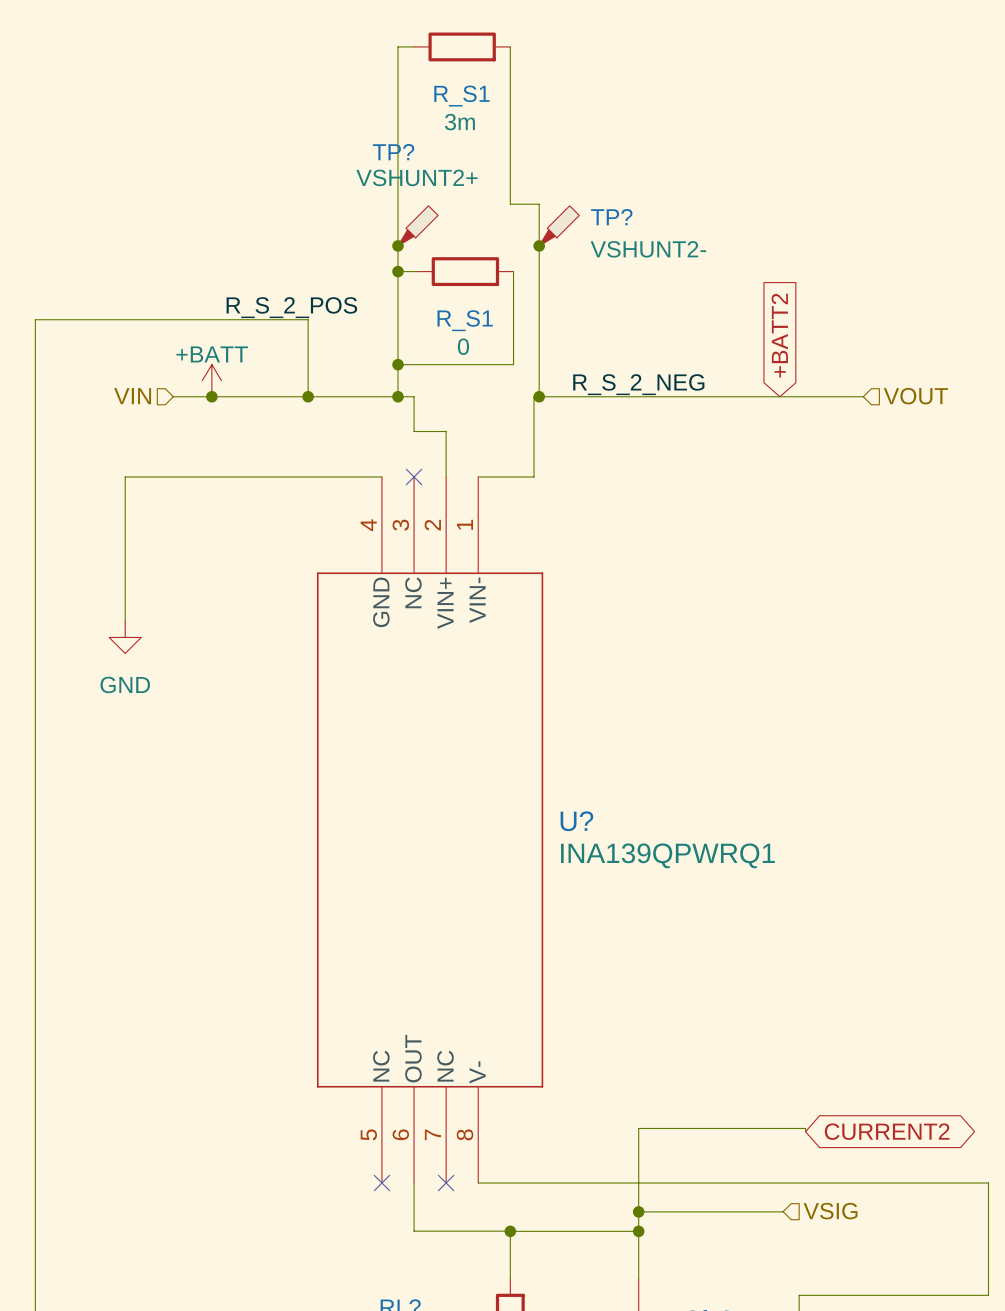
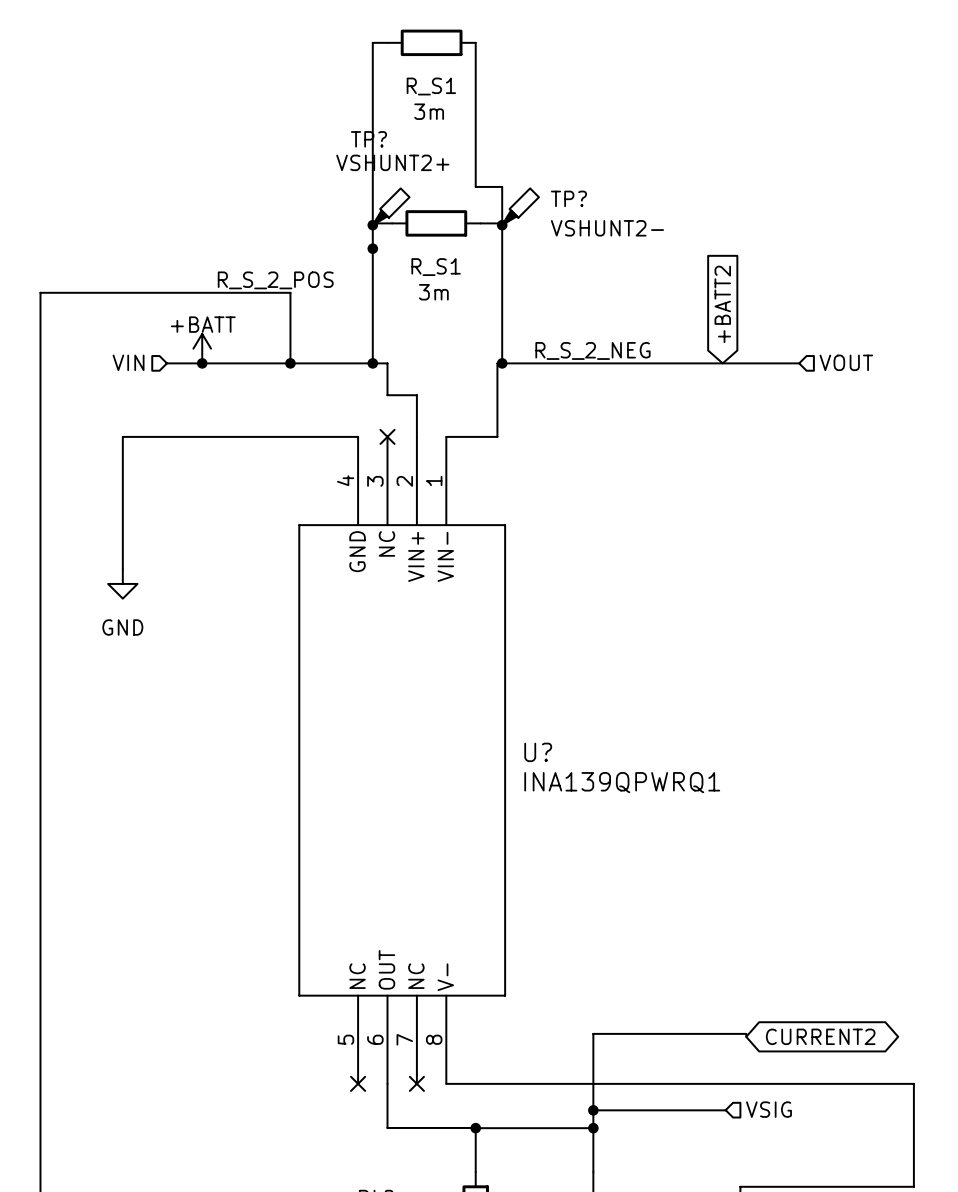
wire: none -> (372, 223) (392, 223)
R_S1: none -> 3m (436, 223)
wire: none -> (480, 223) (502, 223)
wire: (398, 271) (417, 271) -> none
R_S1: 0 (465, 271) -> none
wire: (513, 271) (513, 364) (398, 364) -> none
junction: (398, 364) -> none

